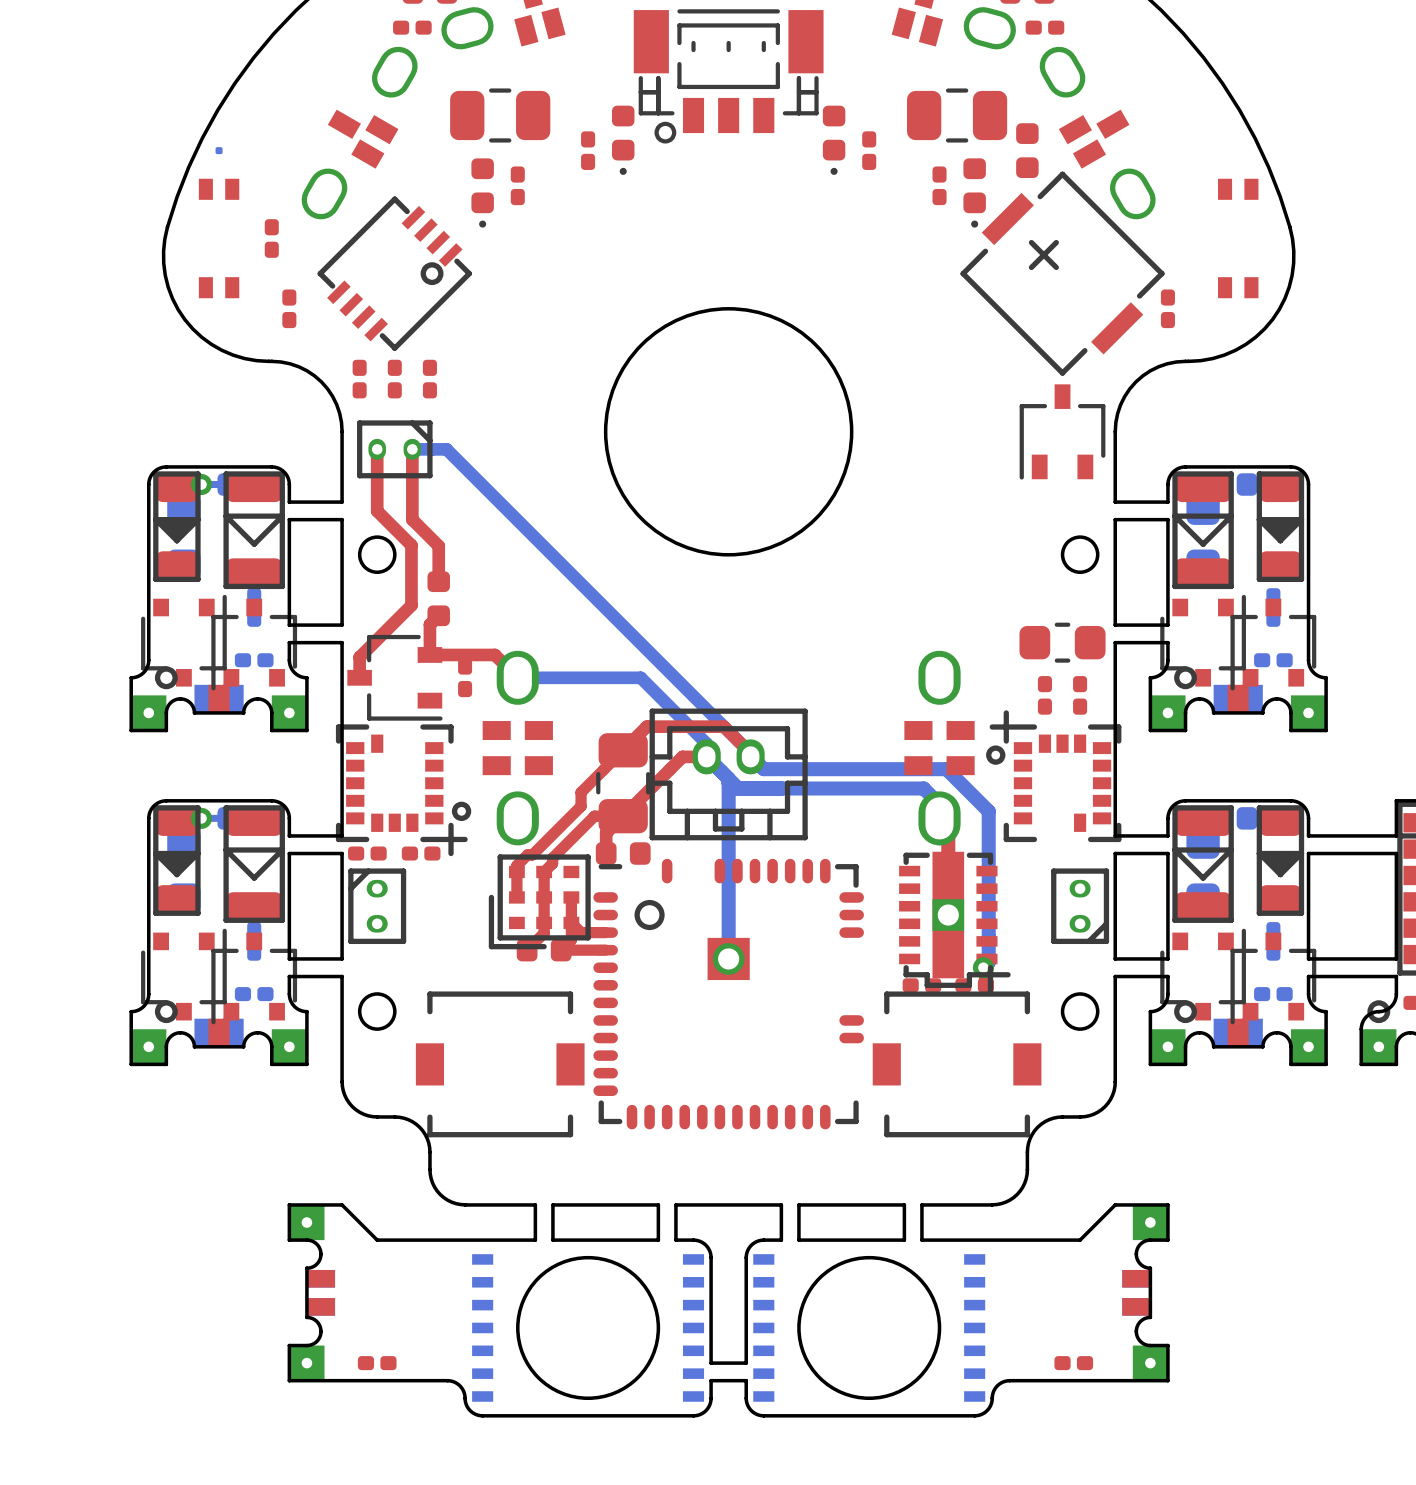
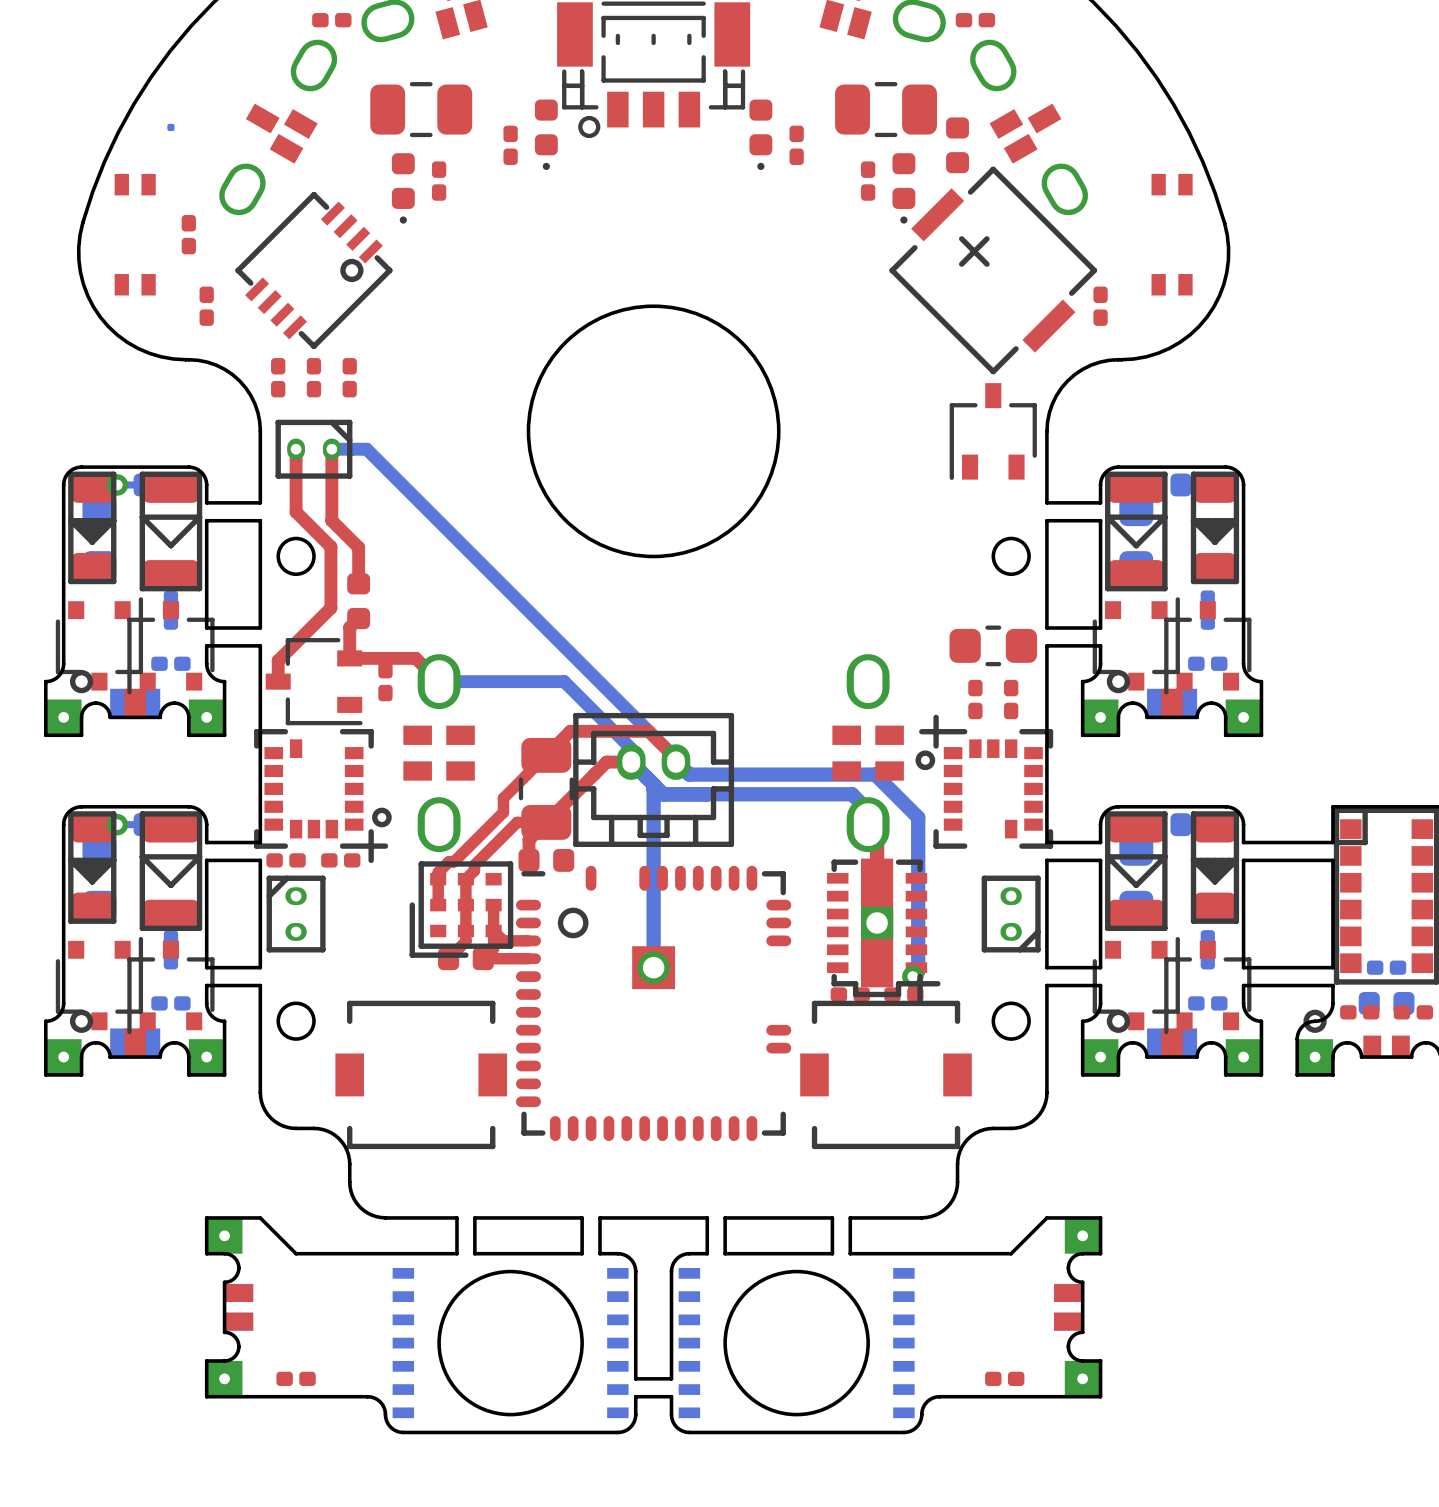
part position: (219, 150) -> (170, 127)

